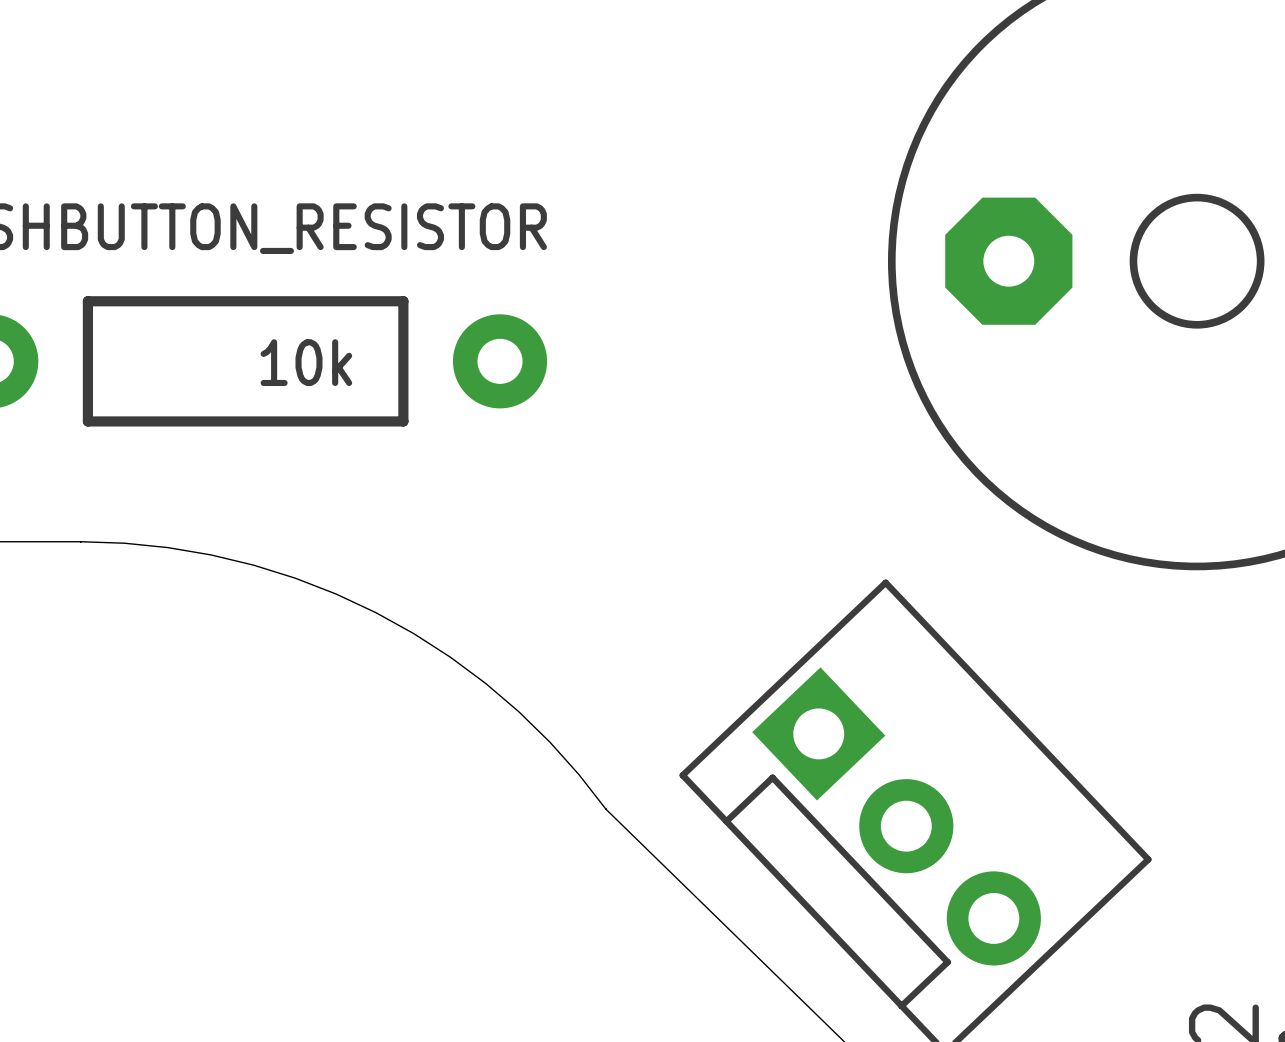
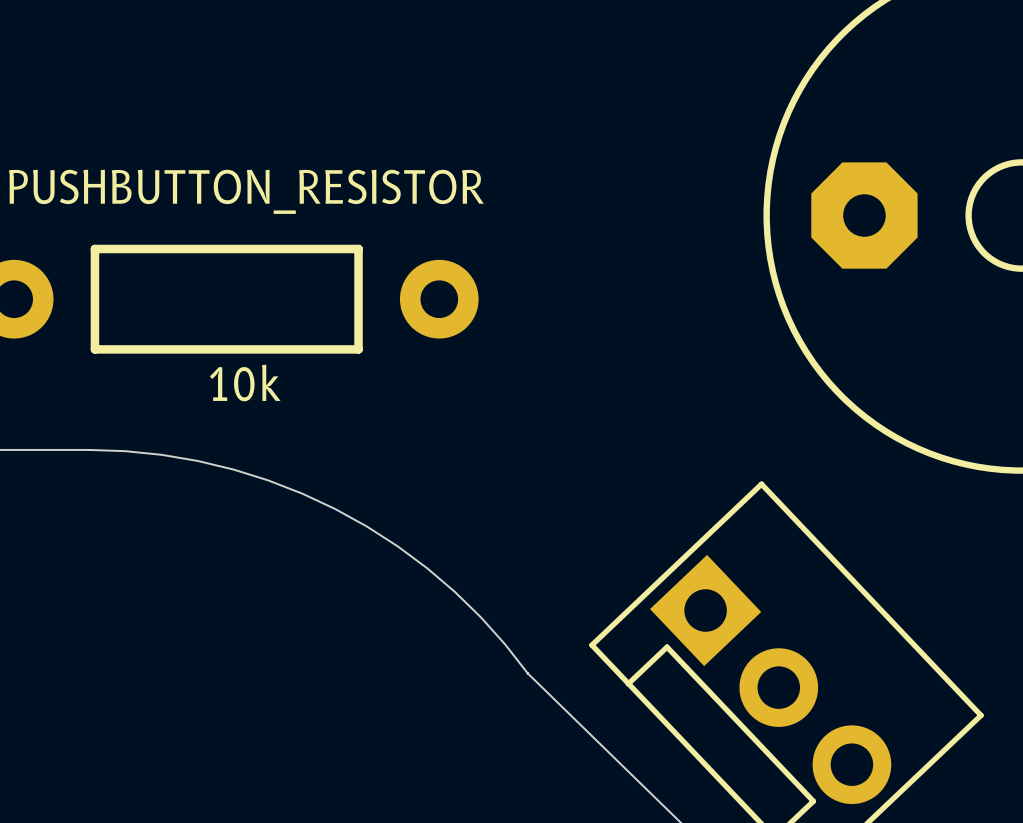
PUSHBUTTON_RESISTOR value position: 10k (306, 362) -> 10k (245, 383)

